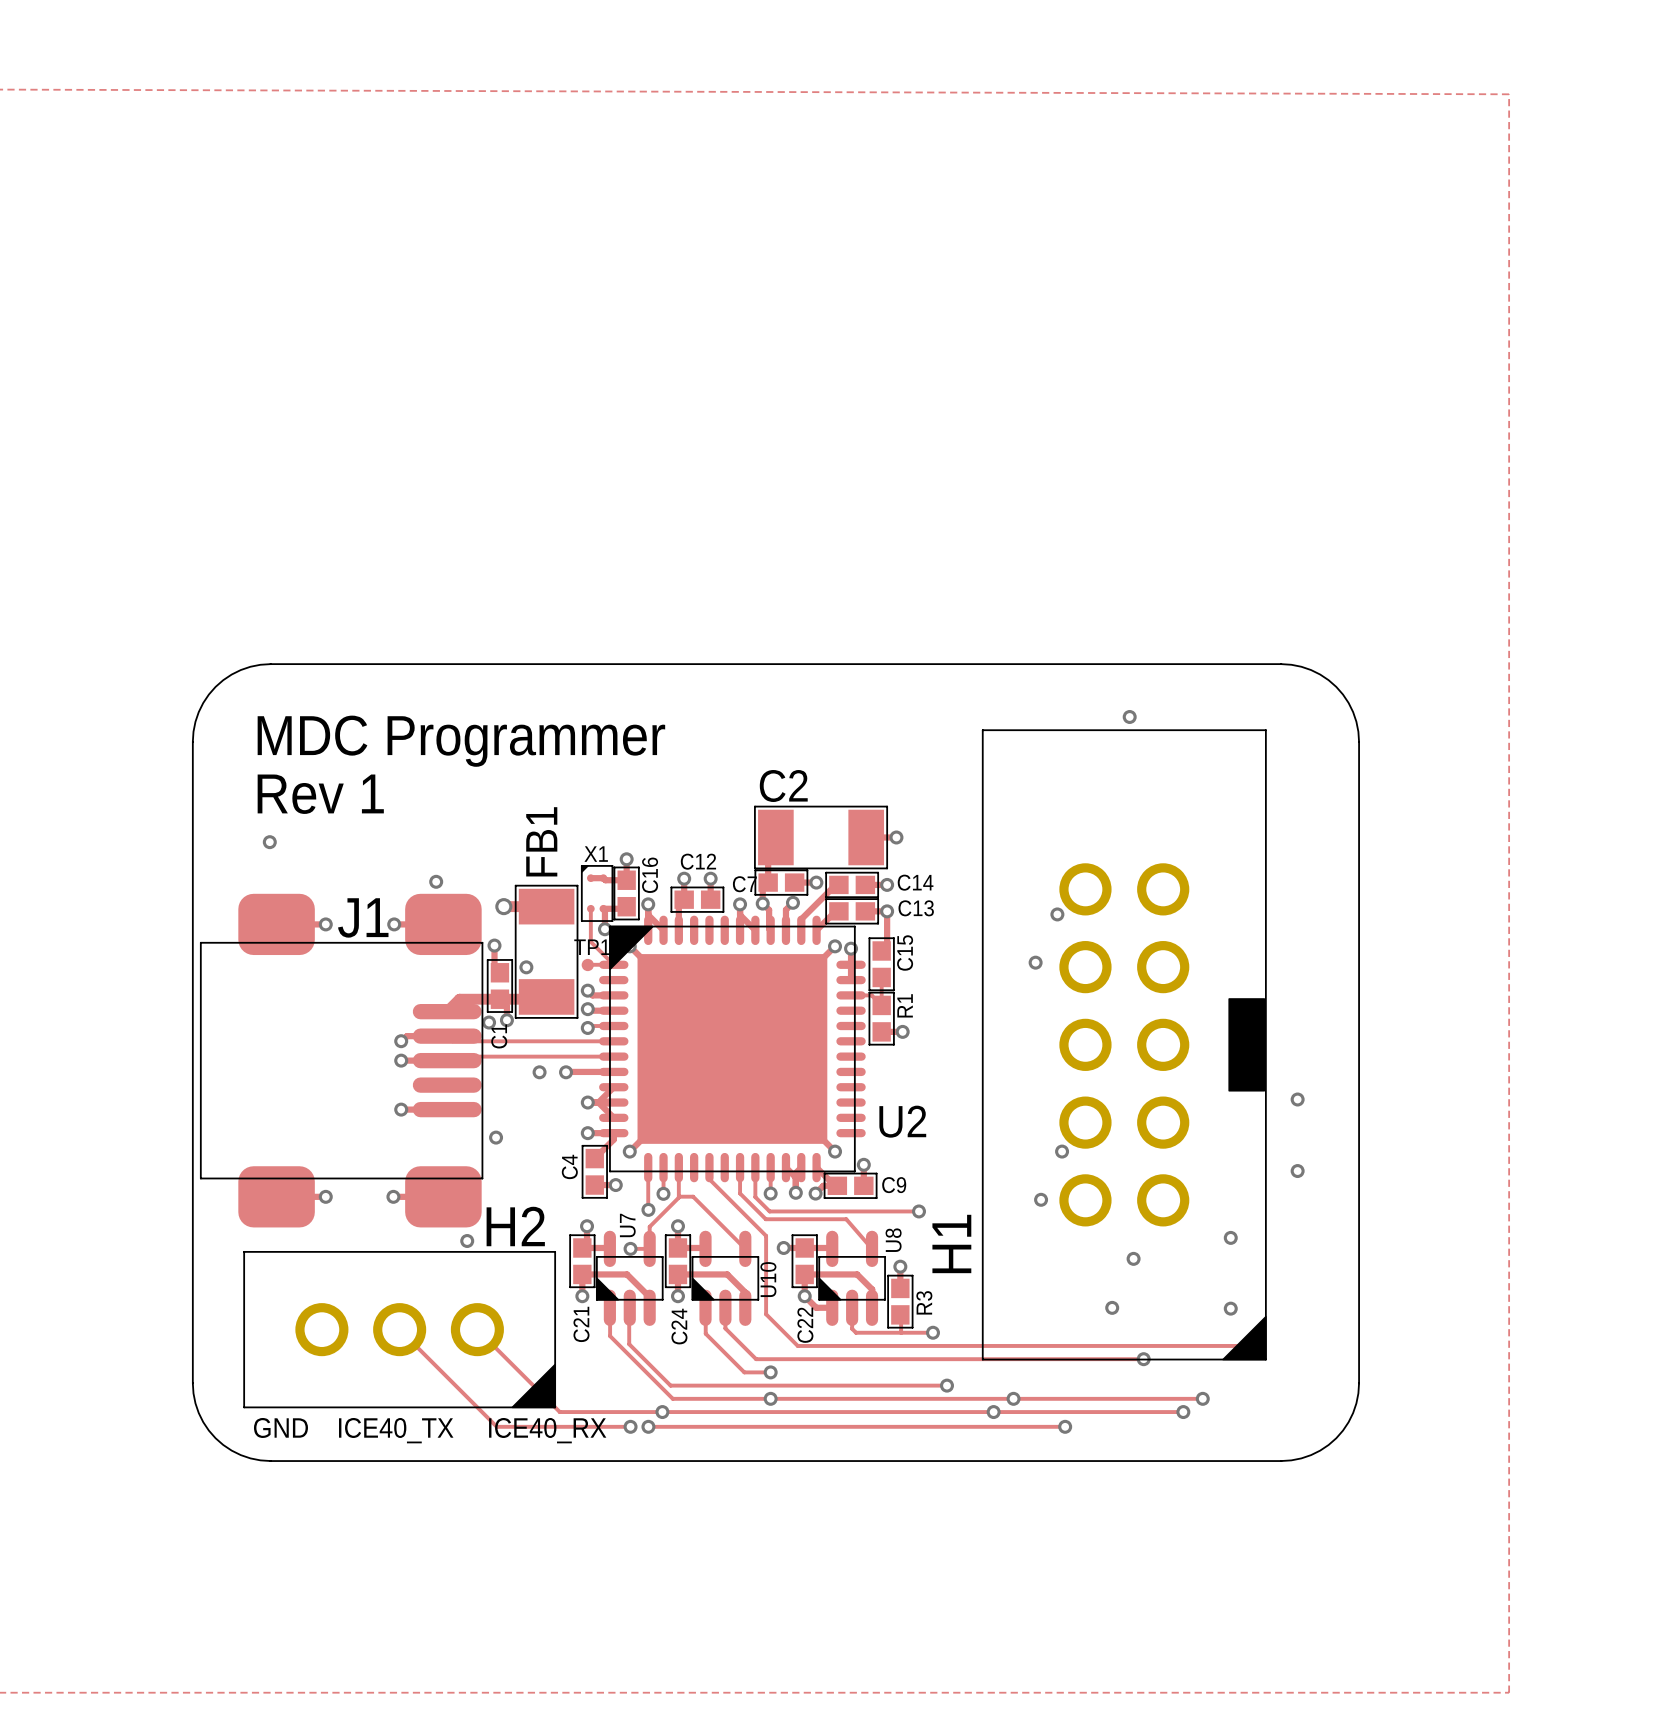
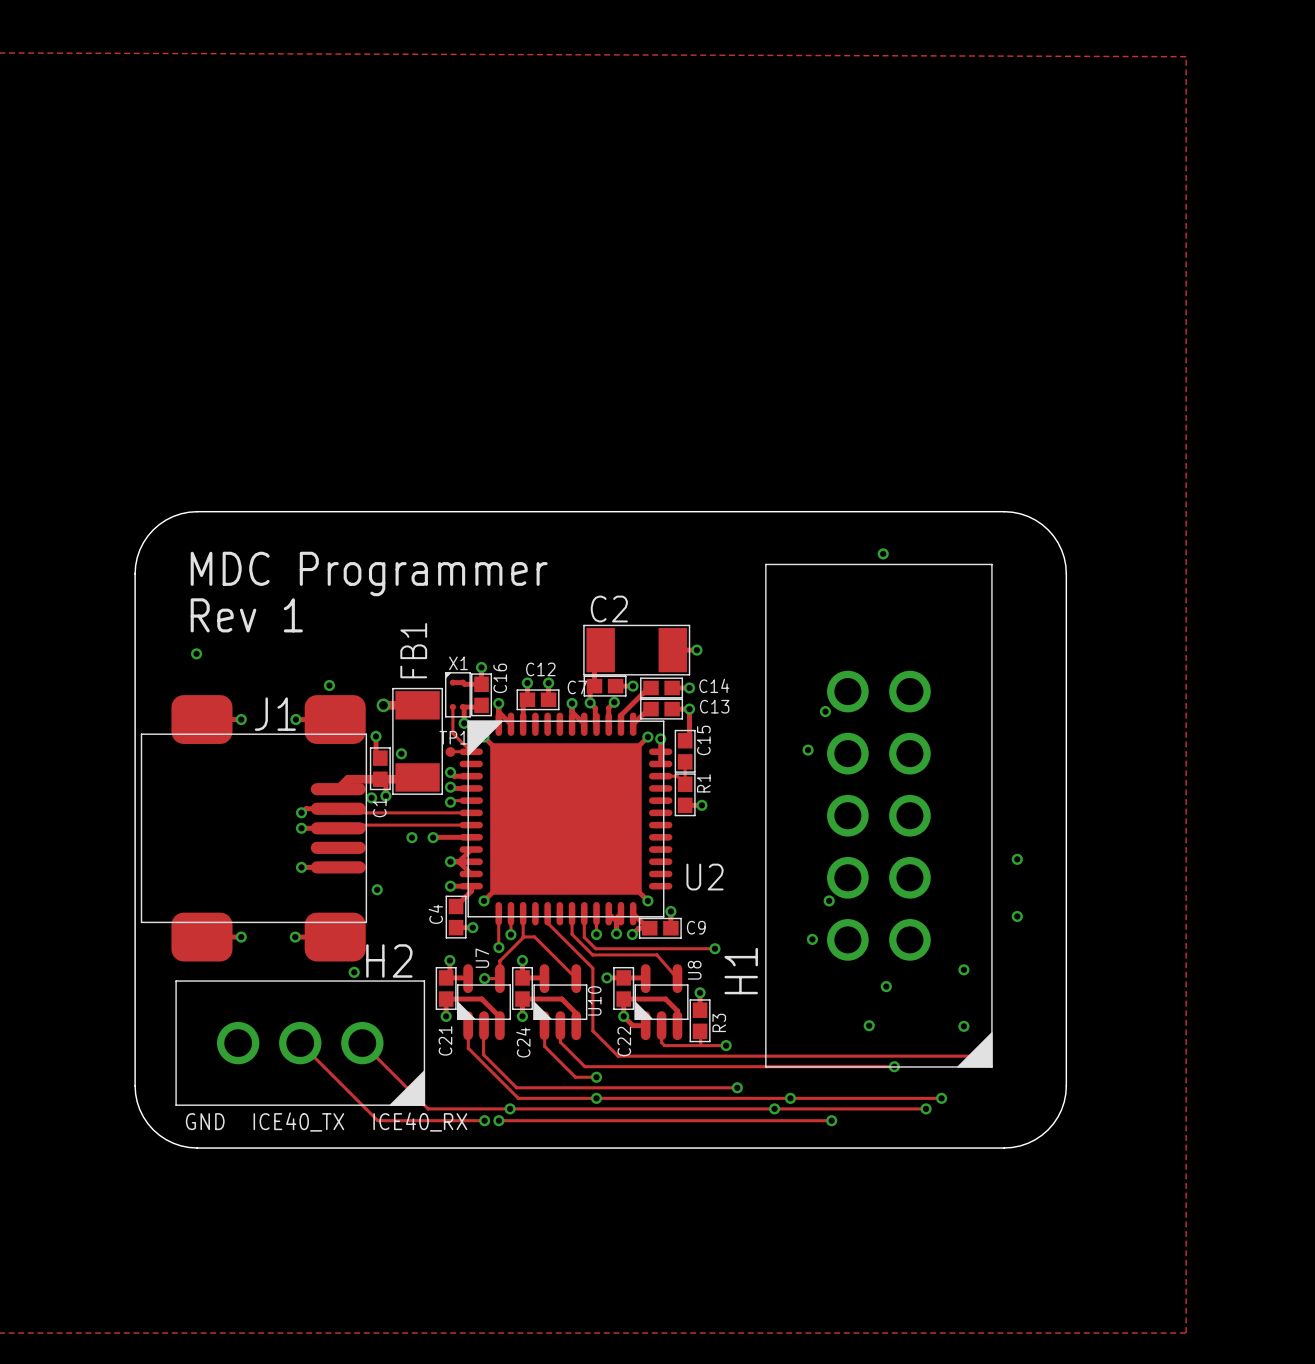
H1 footprint: [981, 729, 1267, 1361] -> [765, 563, 993, 1068]

